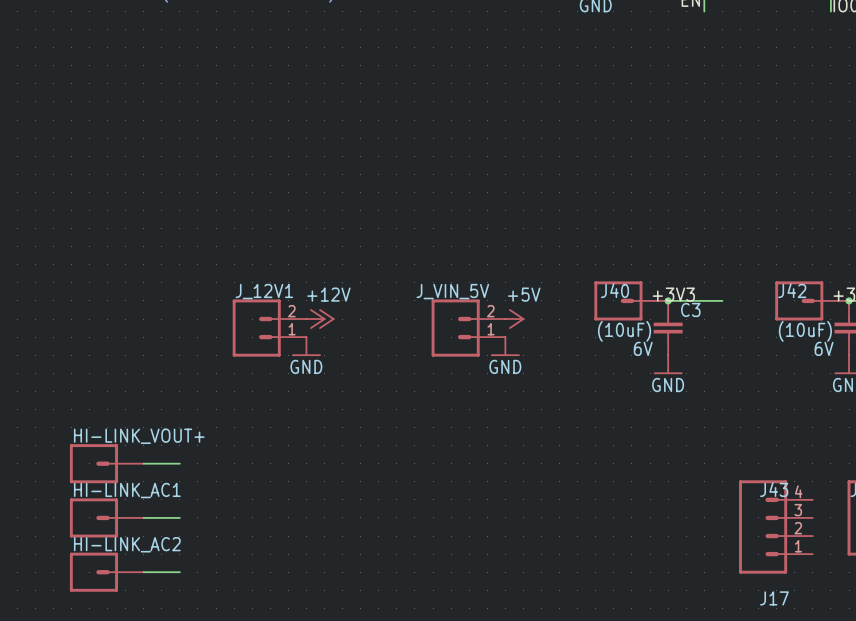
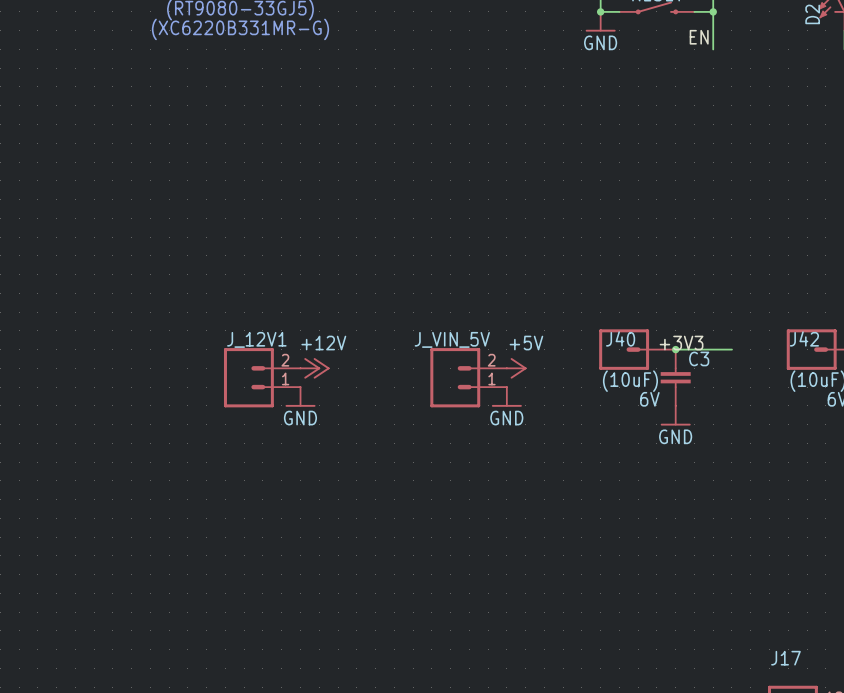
HI-LINK_VOUT+: (106, 463) -> none
wire: (143, 463) (179, 463) -> none
HI-LINK_AC1: (106, 517) -> none
wire: (143, 517) (179, 517) -> none
J43: (775, 526) -> none
HI-LINK_AC2: (106, 572) -> none
wire: (143, 572) (179, 572) -> none

